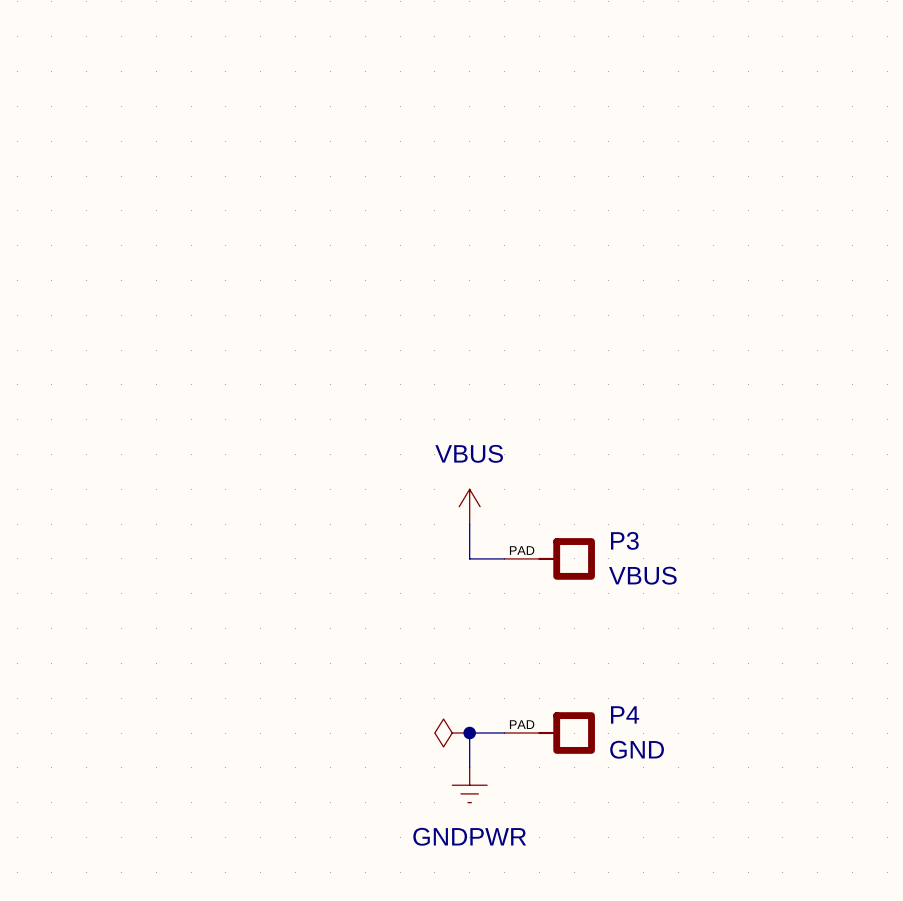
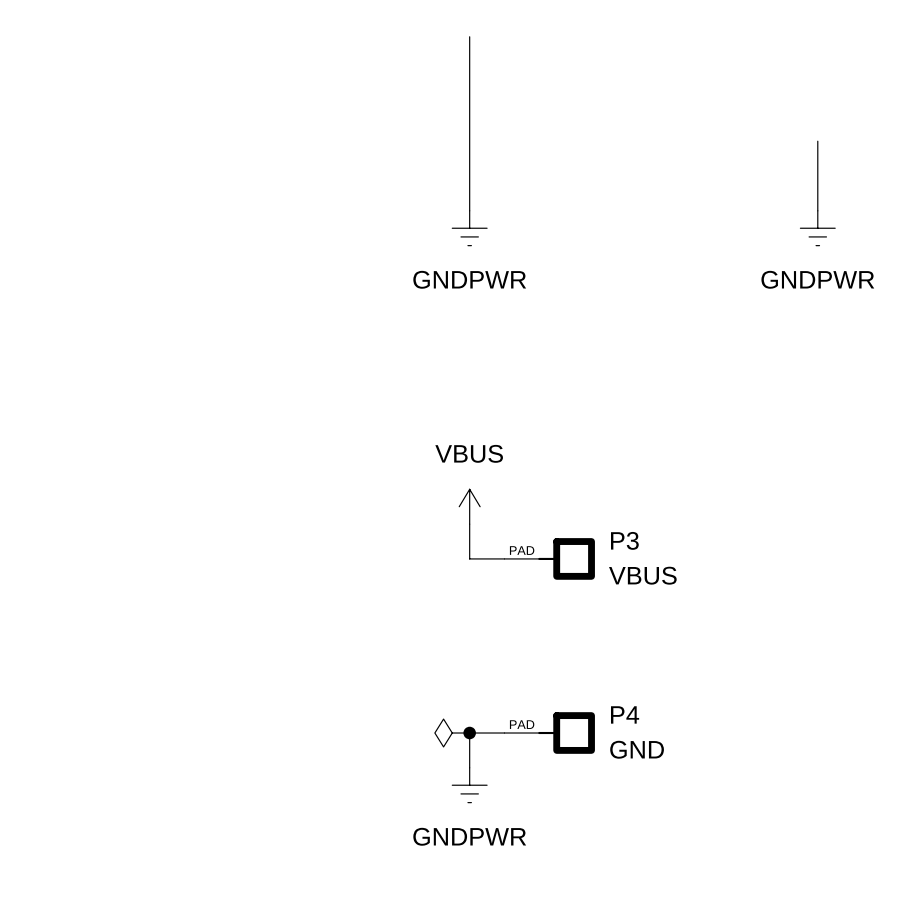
wire: none -> (469, 36) (469, 210)
wire: none -> (817, 141) (817, 210)
power symbol: none -> GNDPWR (469, 228)
power symbol: none -> GNDPWR (817, 228)

